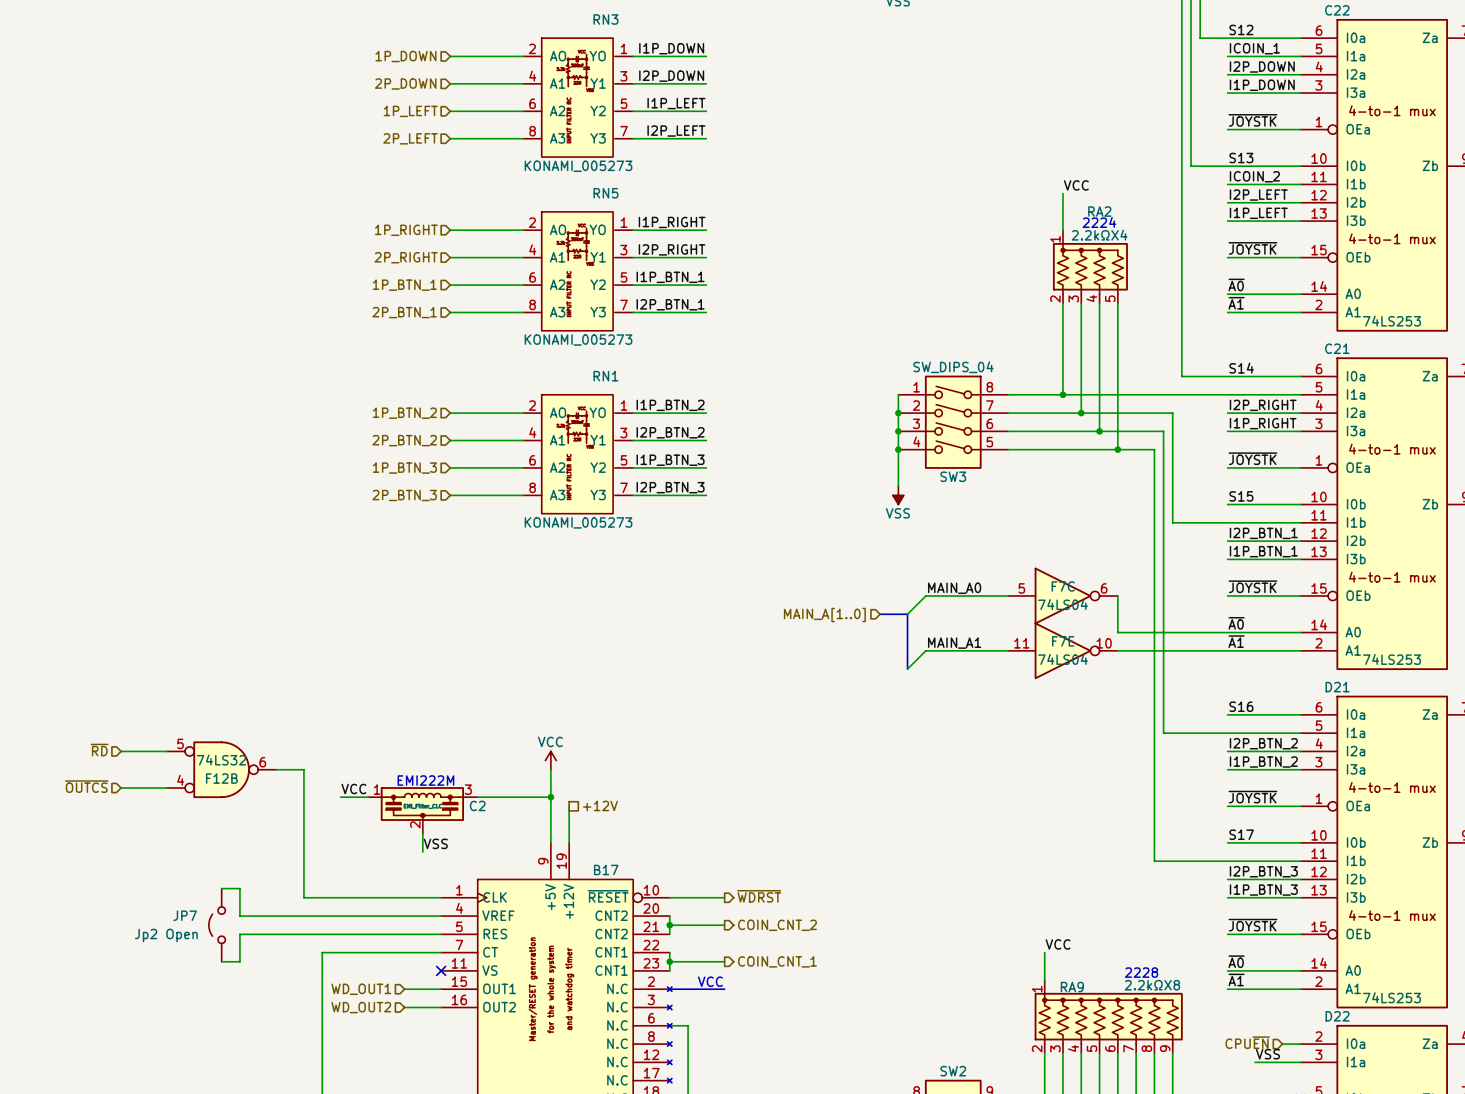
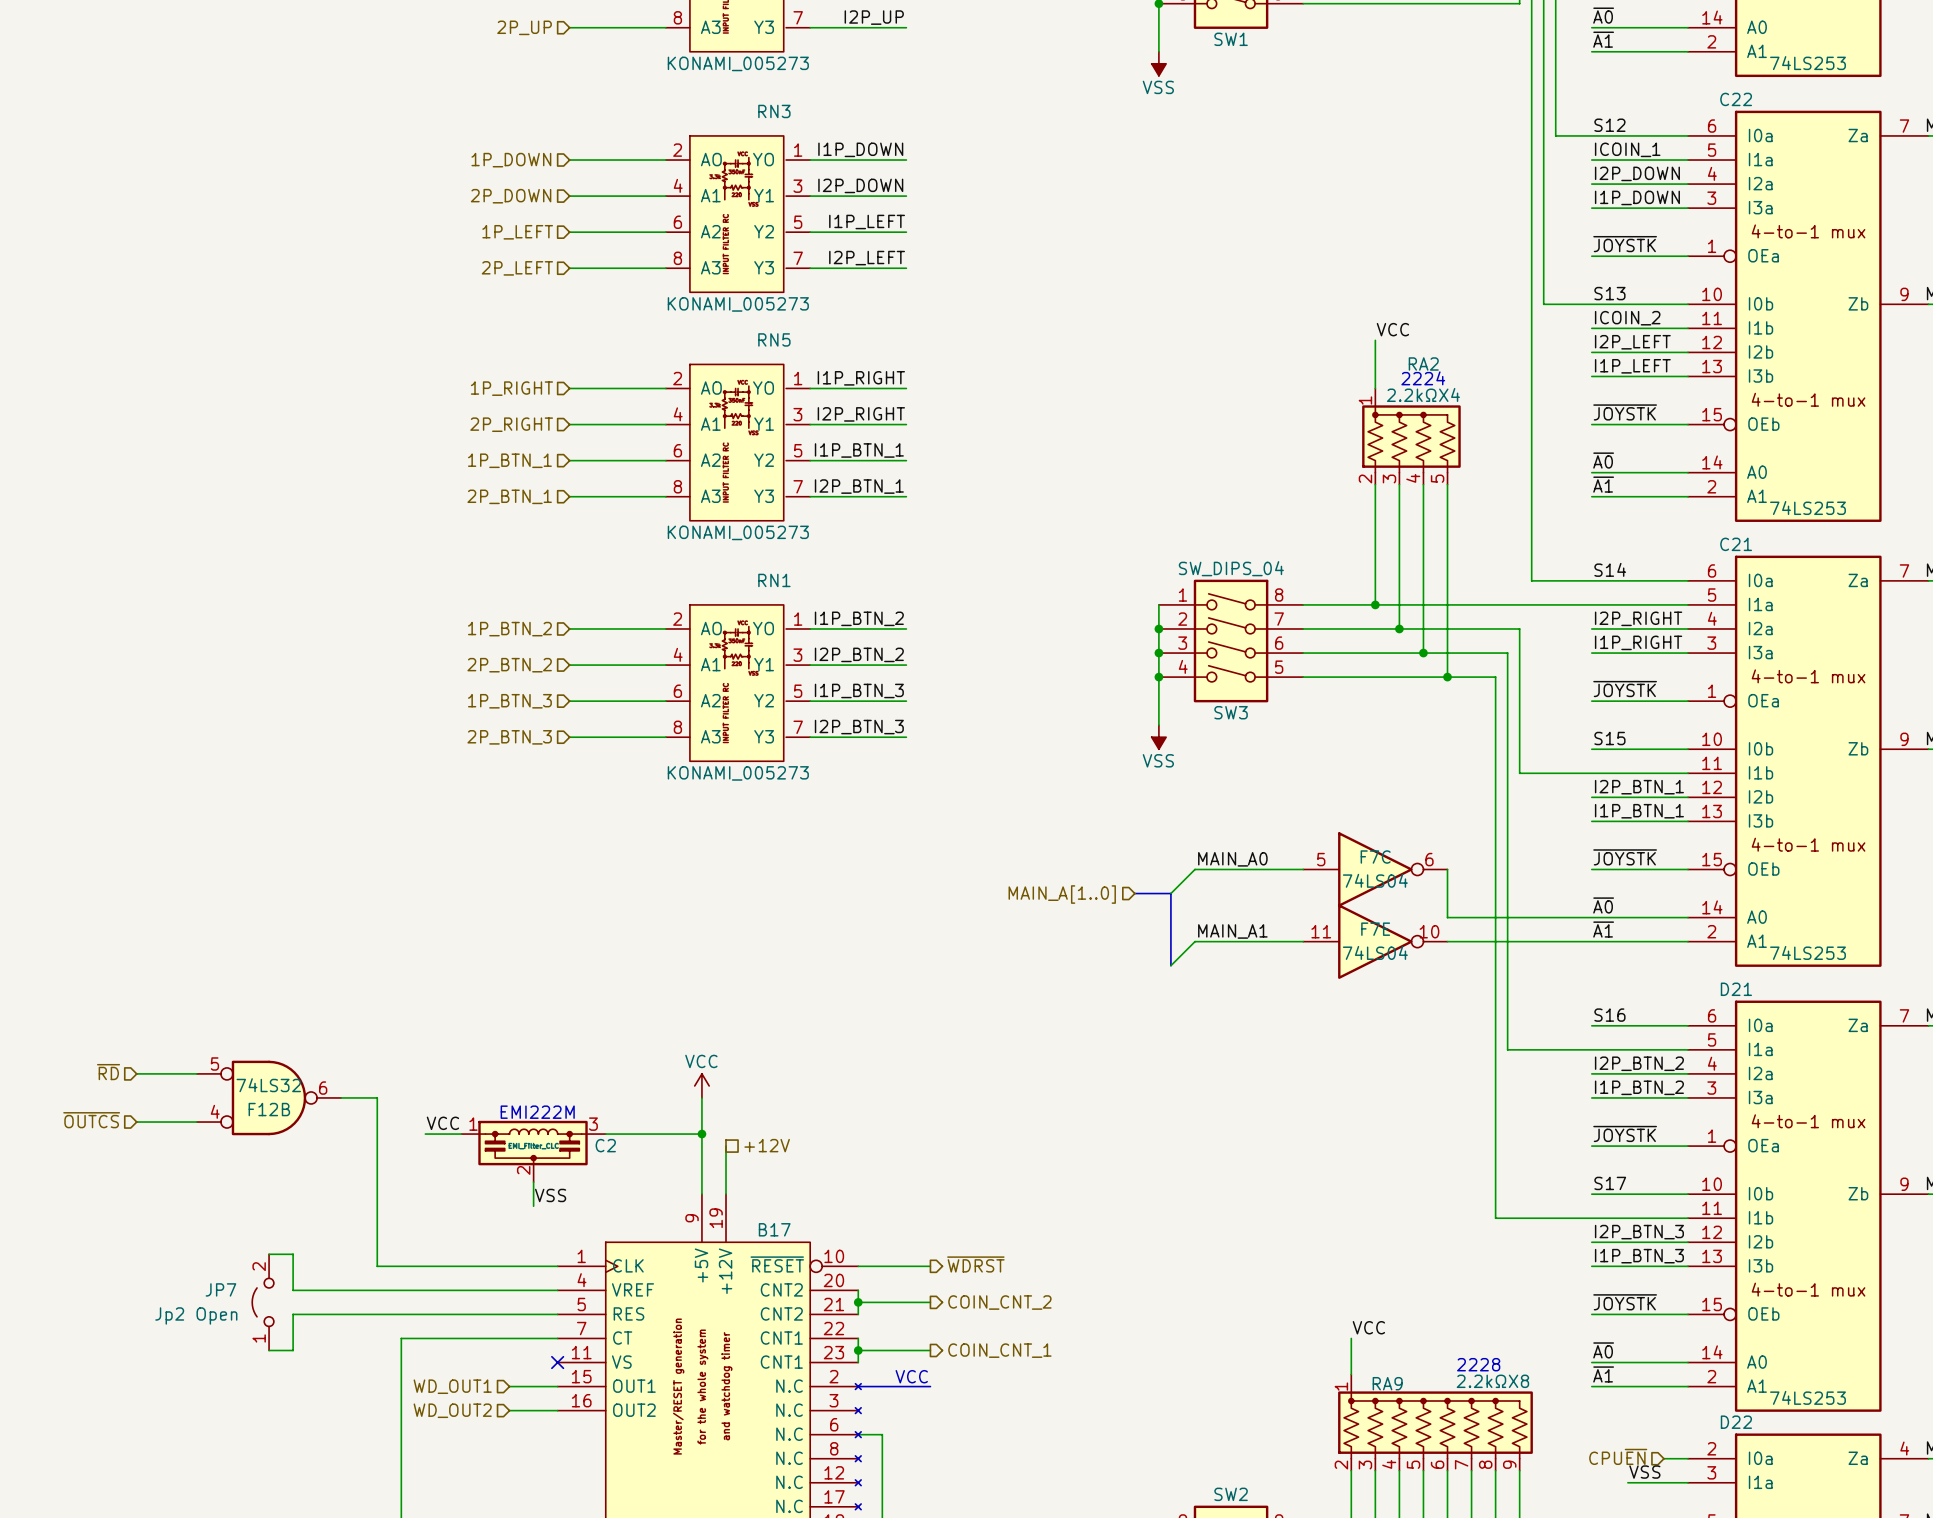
JP7 pin number: none -> 2 (259, 1266)
JP7 pin number: none -> 1 (259, 1338)

